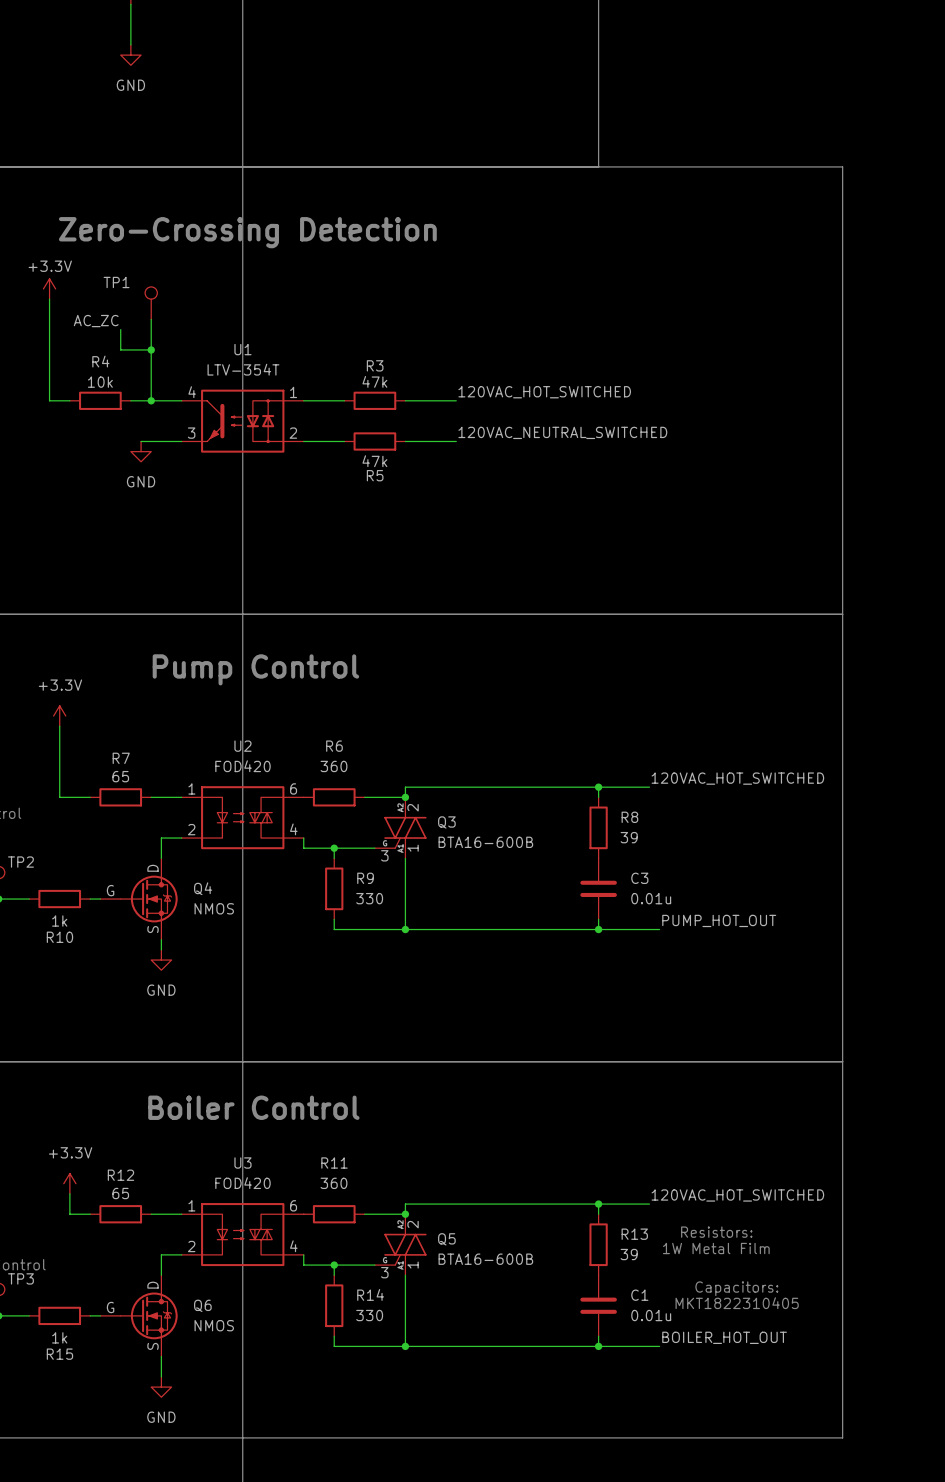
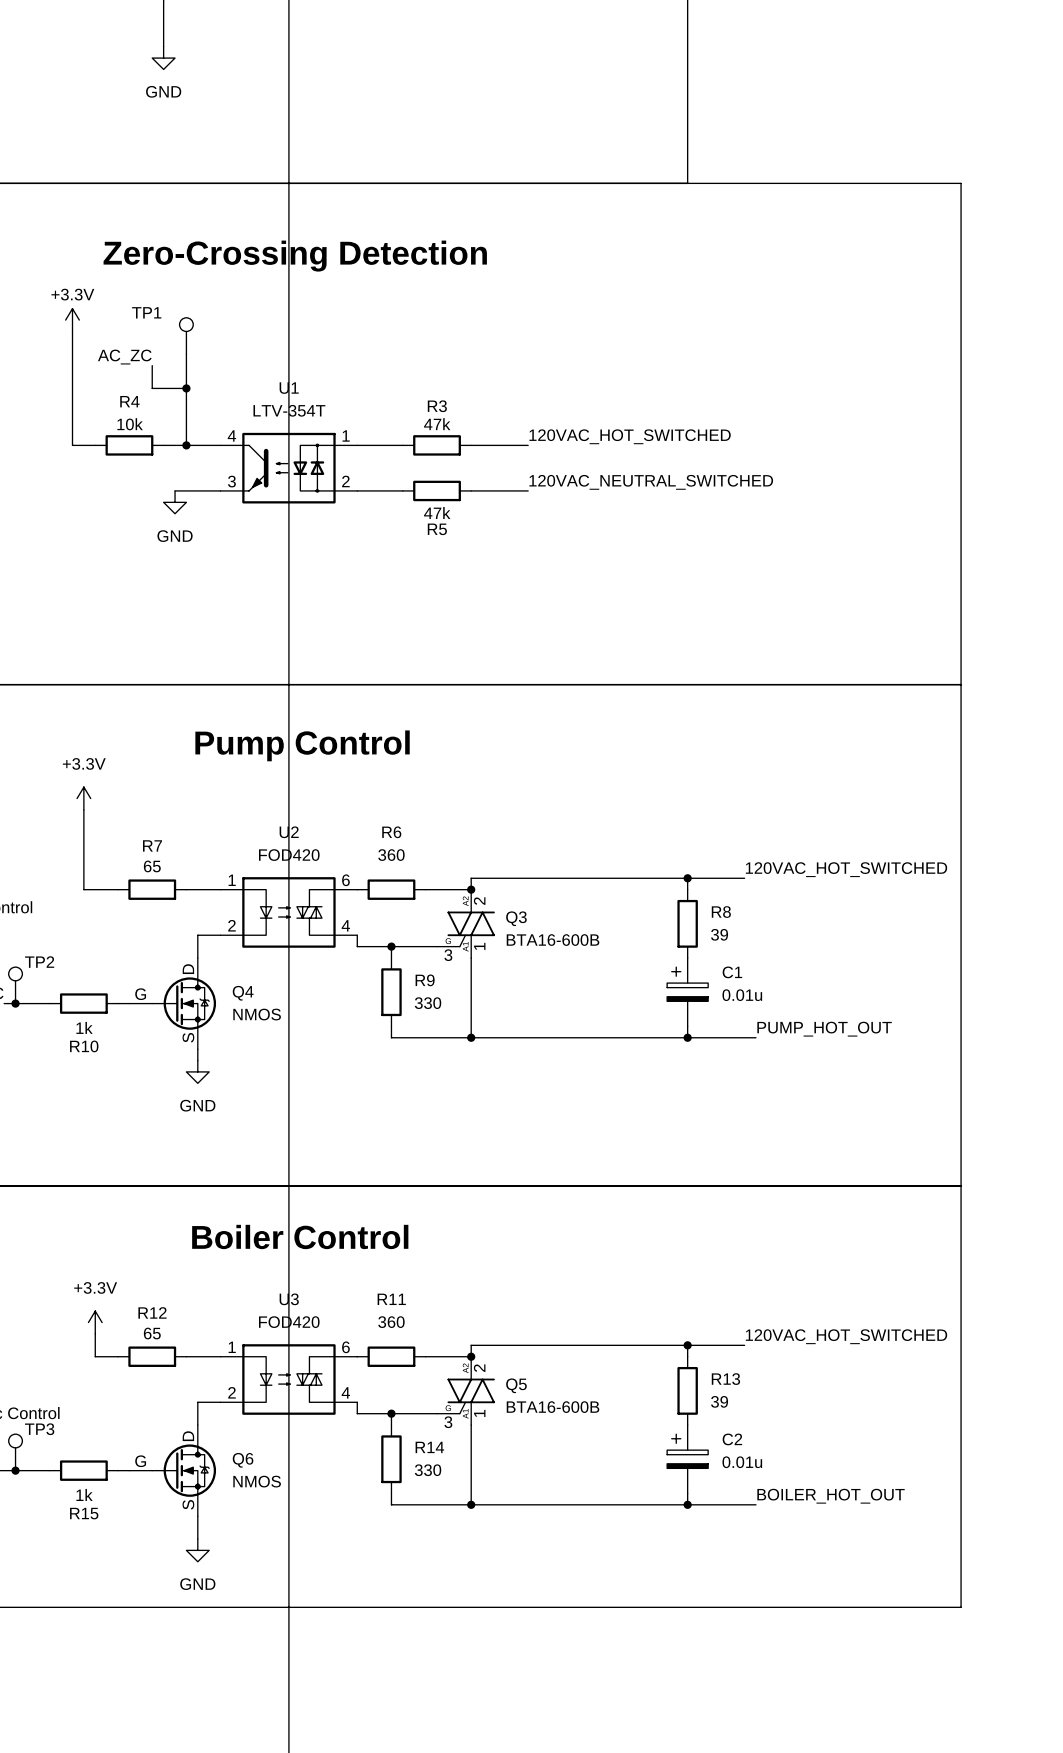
C3: 0.01u (598, 888) -> none
text: Resistors: (716, 1232) -> none
text: 1W Metal Film (716, 1248) -> none
C1 symbol: [580, 1275, 617, 1337] -> [667, 958, 709, 1027]
text: Capacitors: (736, 1288) -> none
text: MKT1822310405 (737, 1303) -> none
C2: none -> 0.01u (687, 1459)

